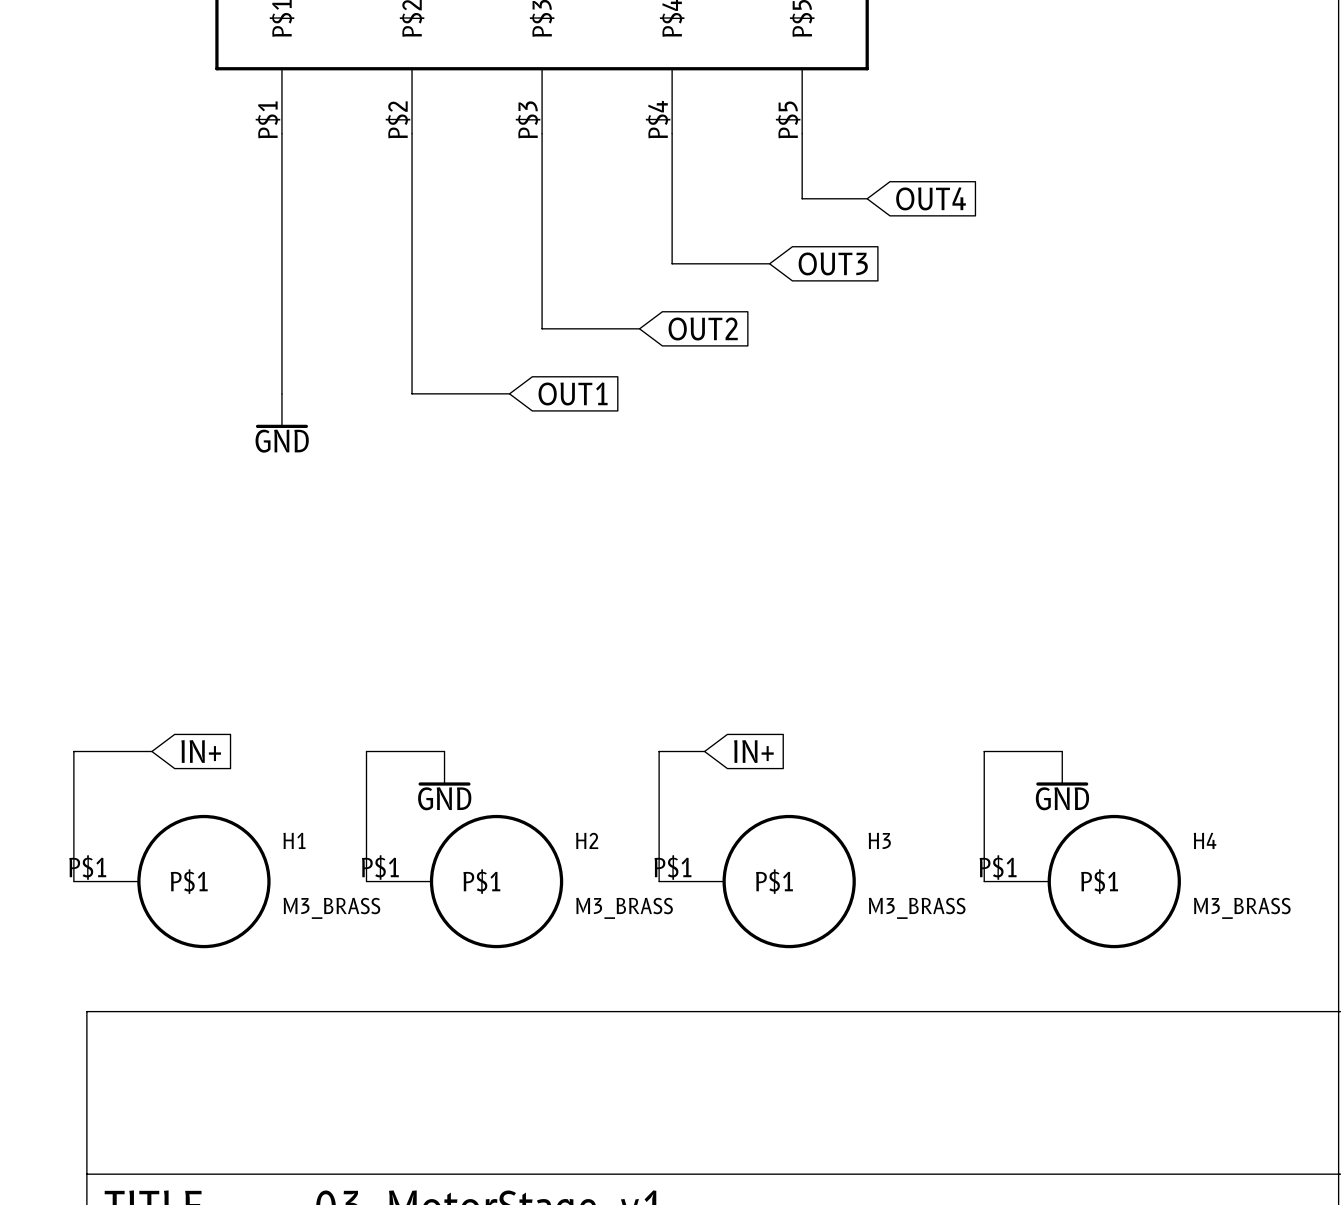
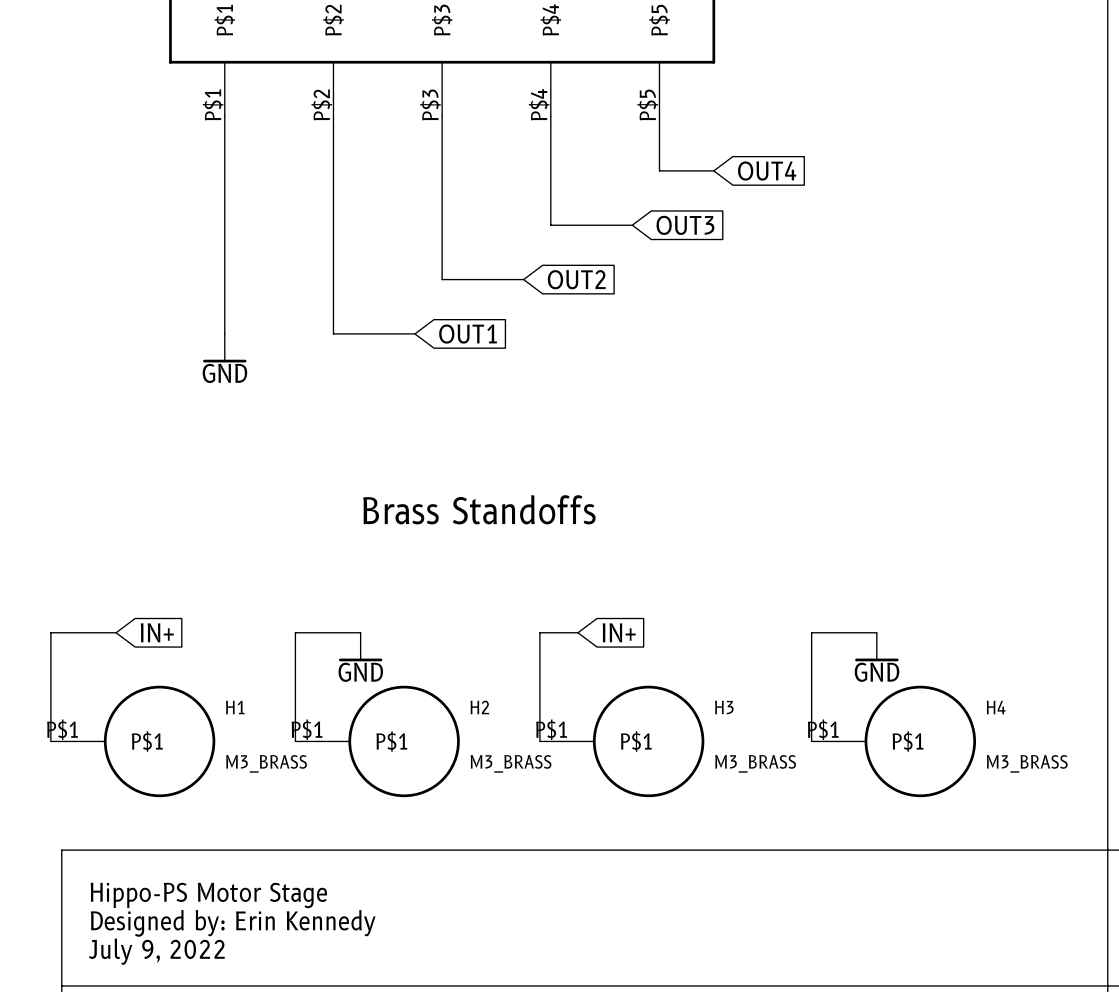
text: none -> Brass Standoffs (479, 509)
text: none -> Hippo-PS Motor Stage (208, 895)
text: none -> Designed by: Erin Kennedy (233, 923)
text: none -> July 9, 2022 (156, 951)

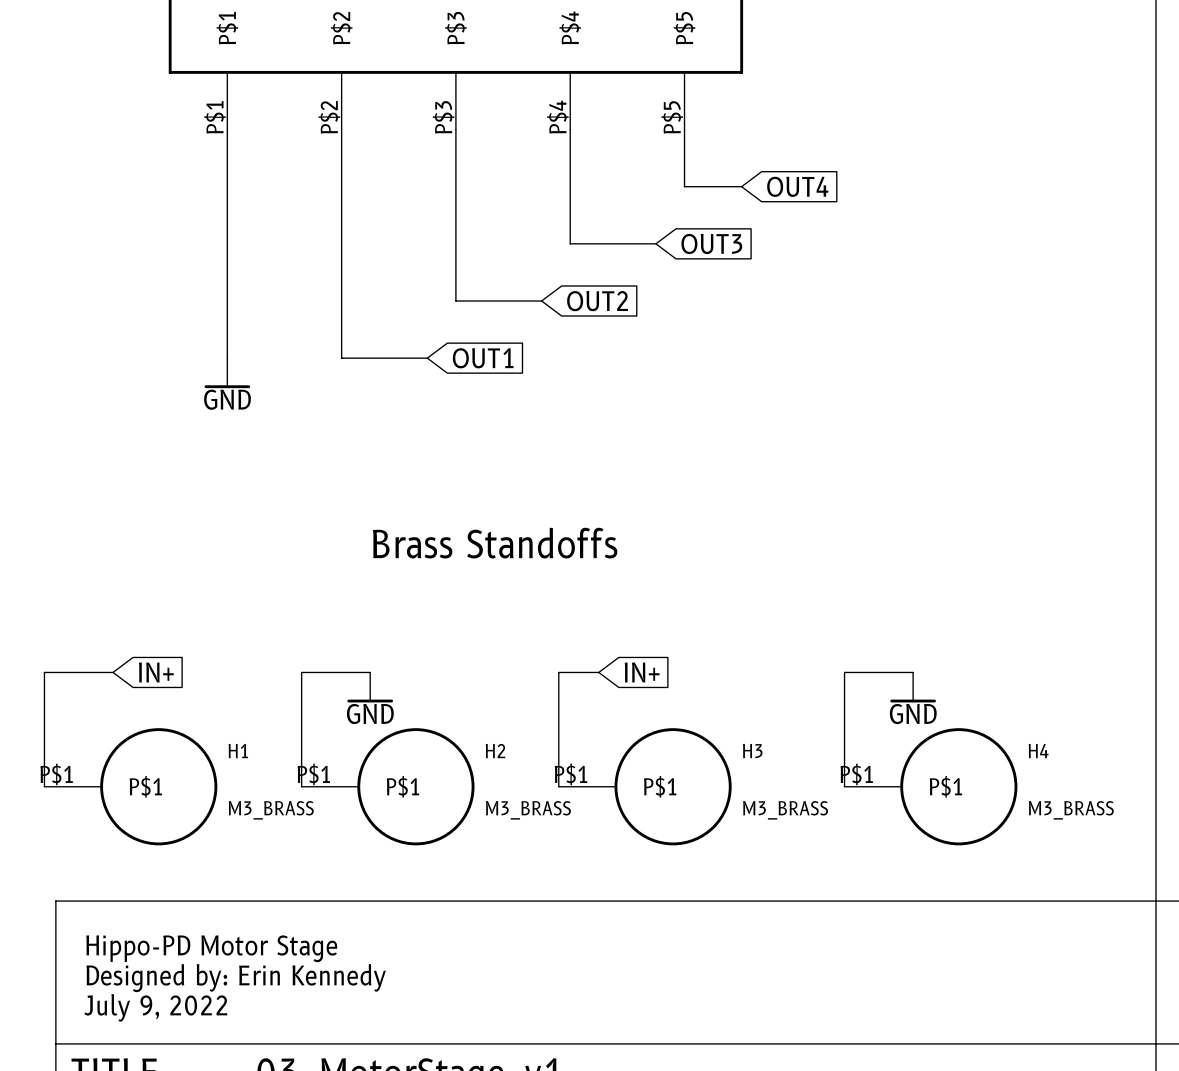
text: Hippo-PS Motor Stage (208, 895) -> Hippo-PD Motor Stage (211, 948)

